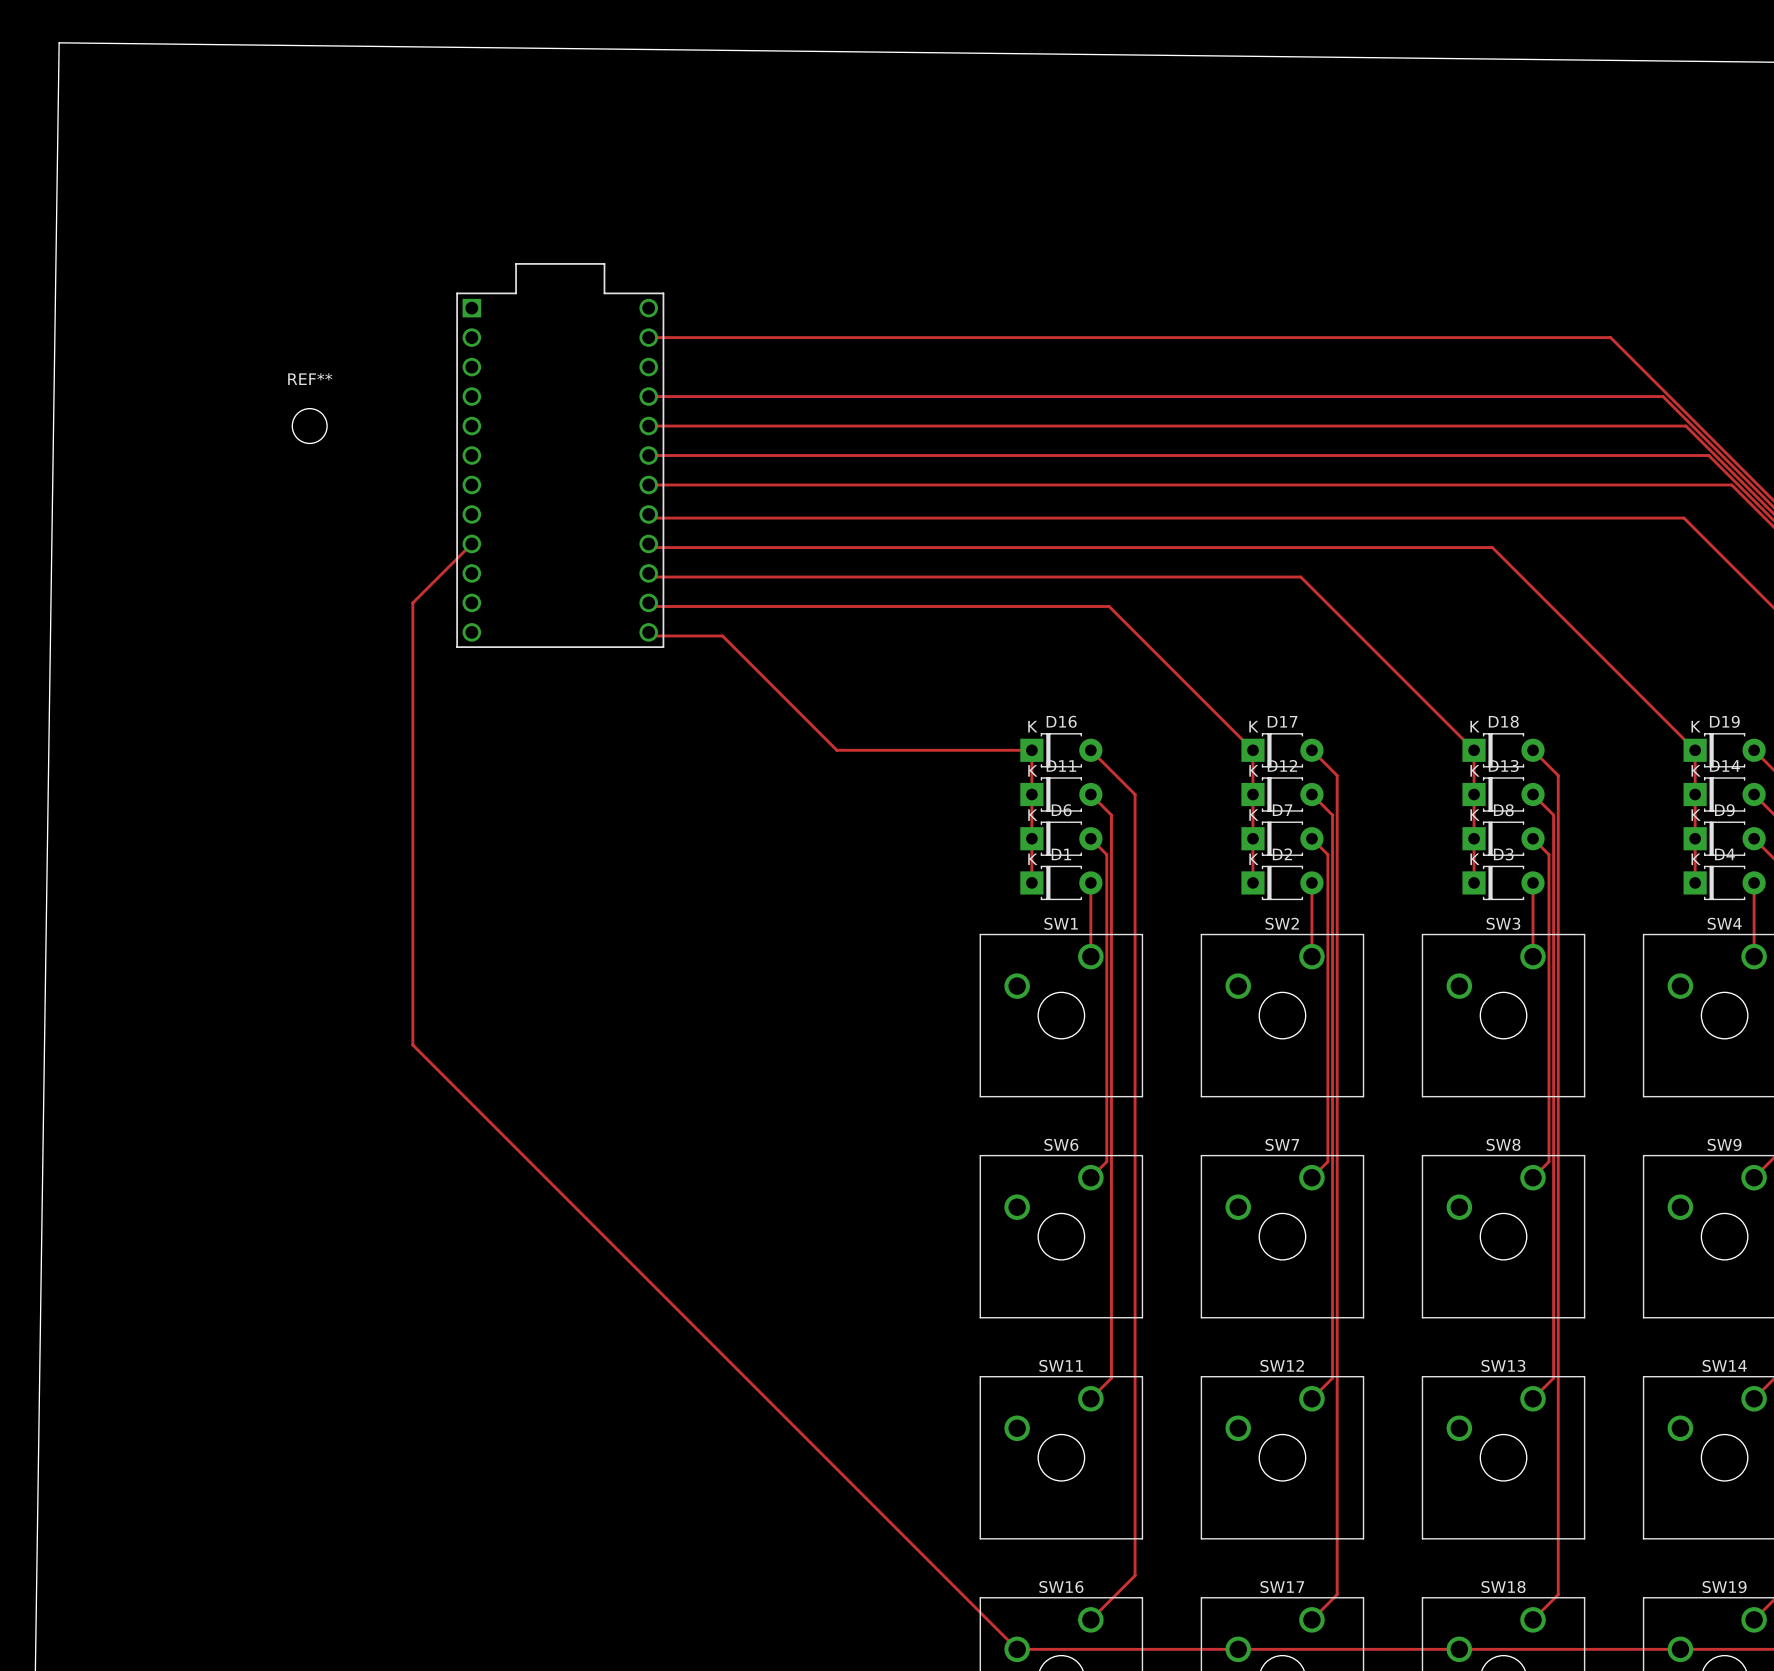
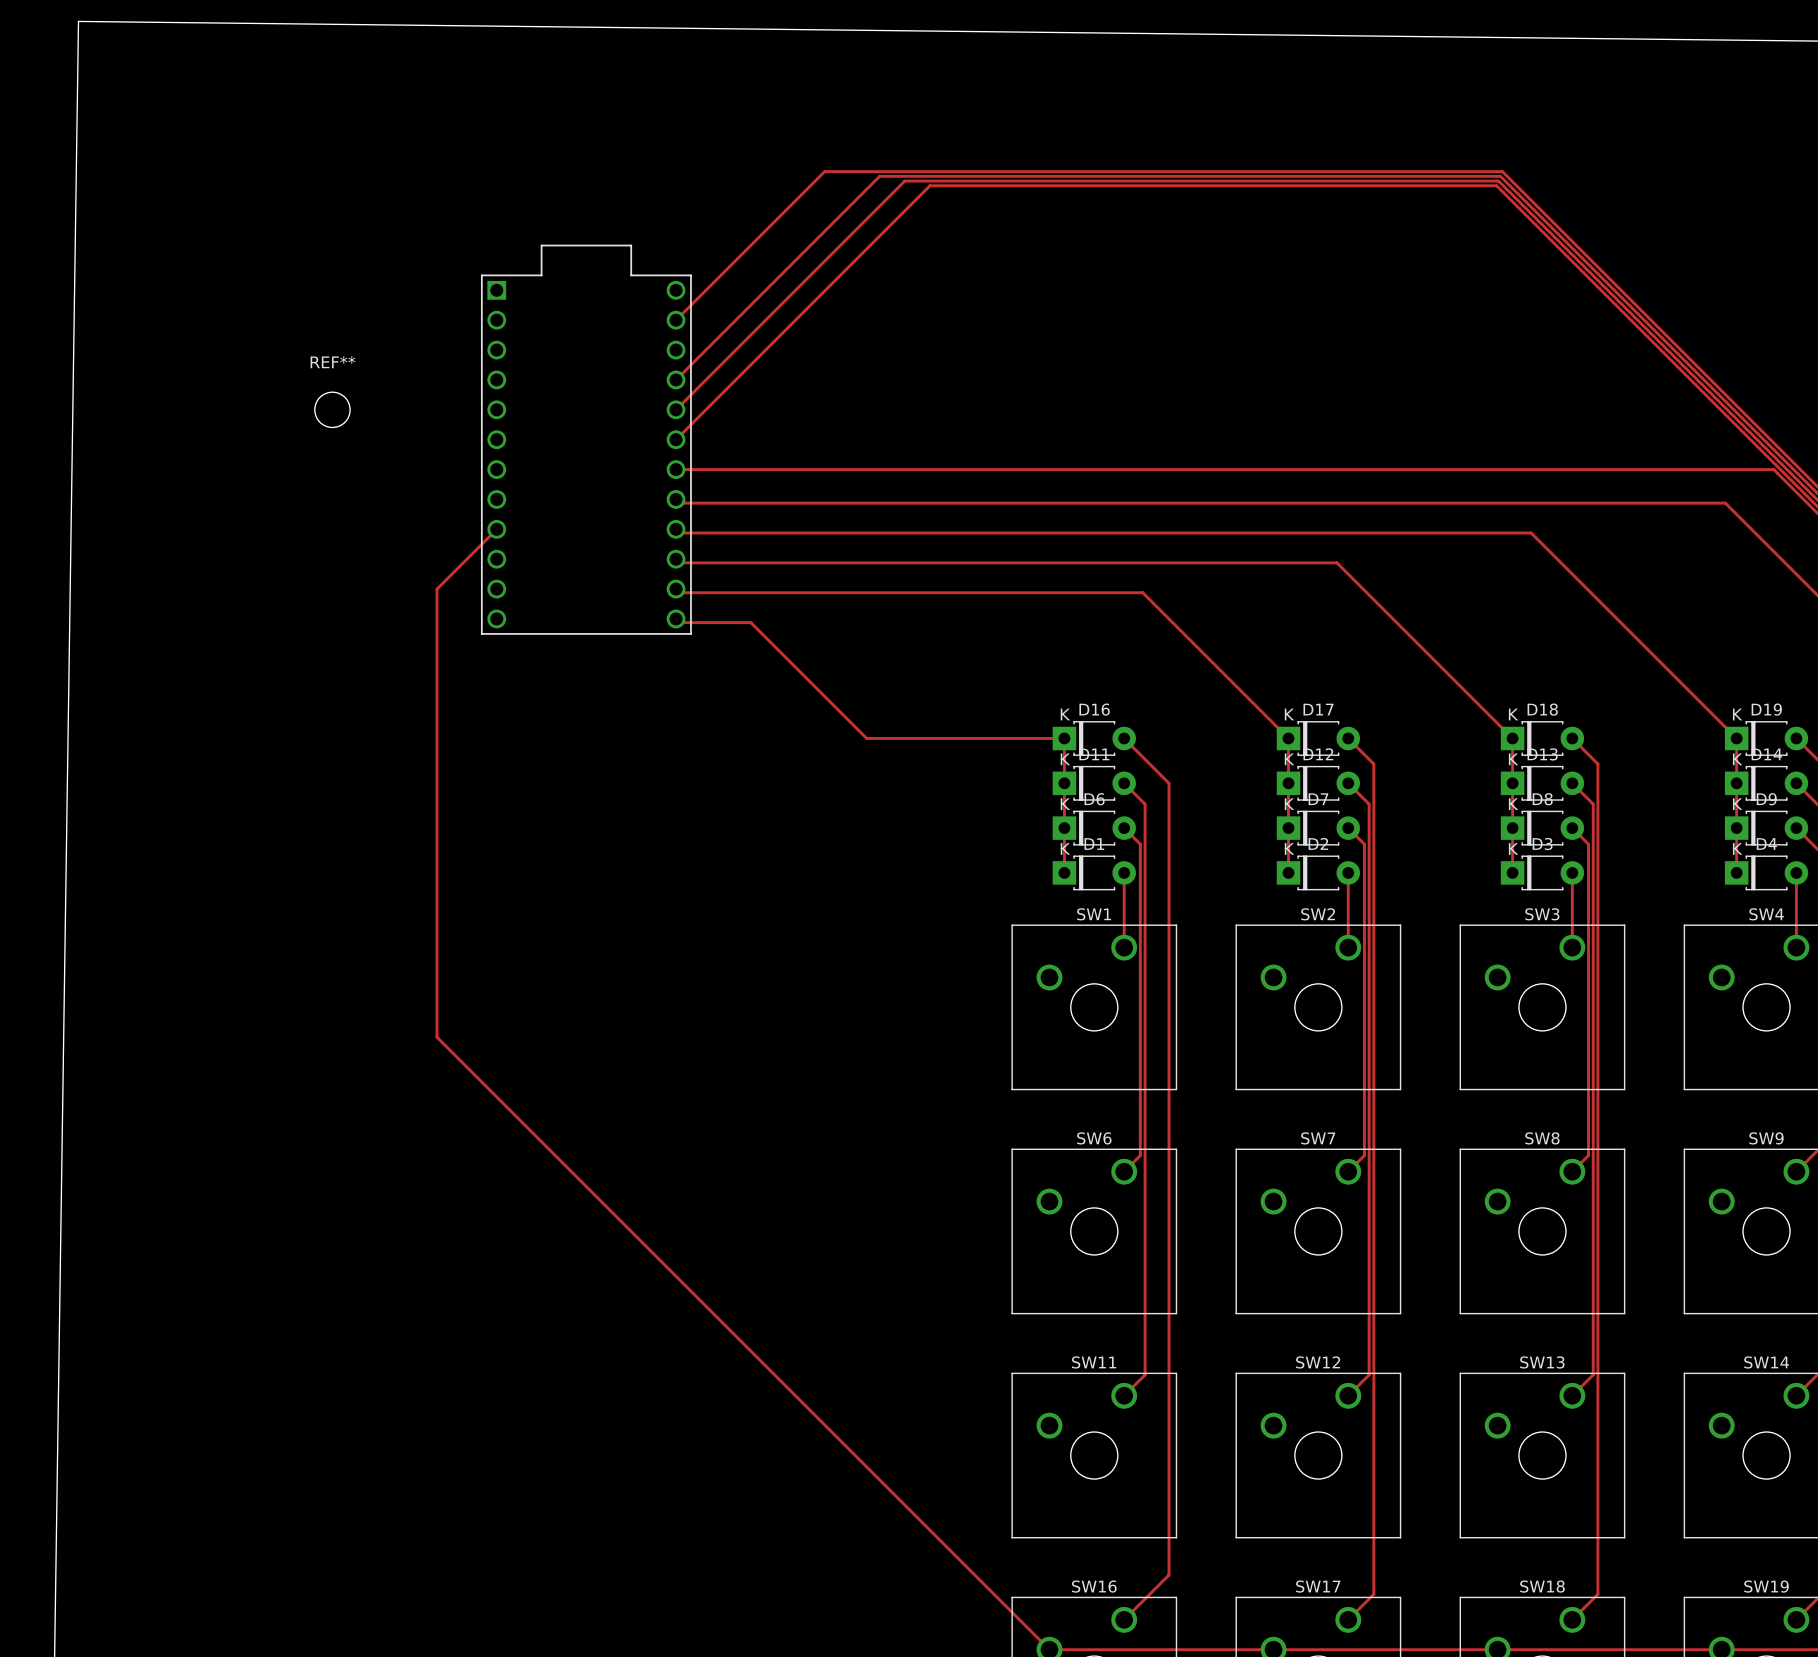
track: (648, 337) (1610, 337) -> (676, 320) (824, 171) (1502, 171) (1651, 320)
track: (648, 396) (1663, 396) -> (676, 379) (879, 176) (1500, 176) (1704, 379)
track: (648, 426) (1685, 426) -> (676, 409) (904, 181) (1498, 181) (1727, 409)
track: (648, 455) (1708, 455) -> (676, 439) (929, 185) (1496, 185) (1750, 439)

